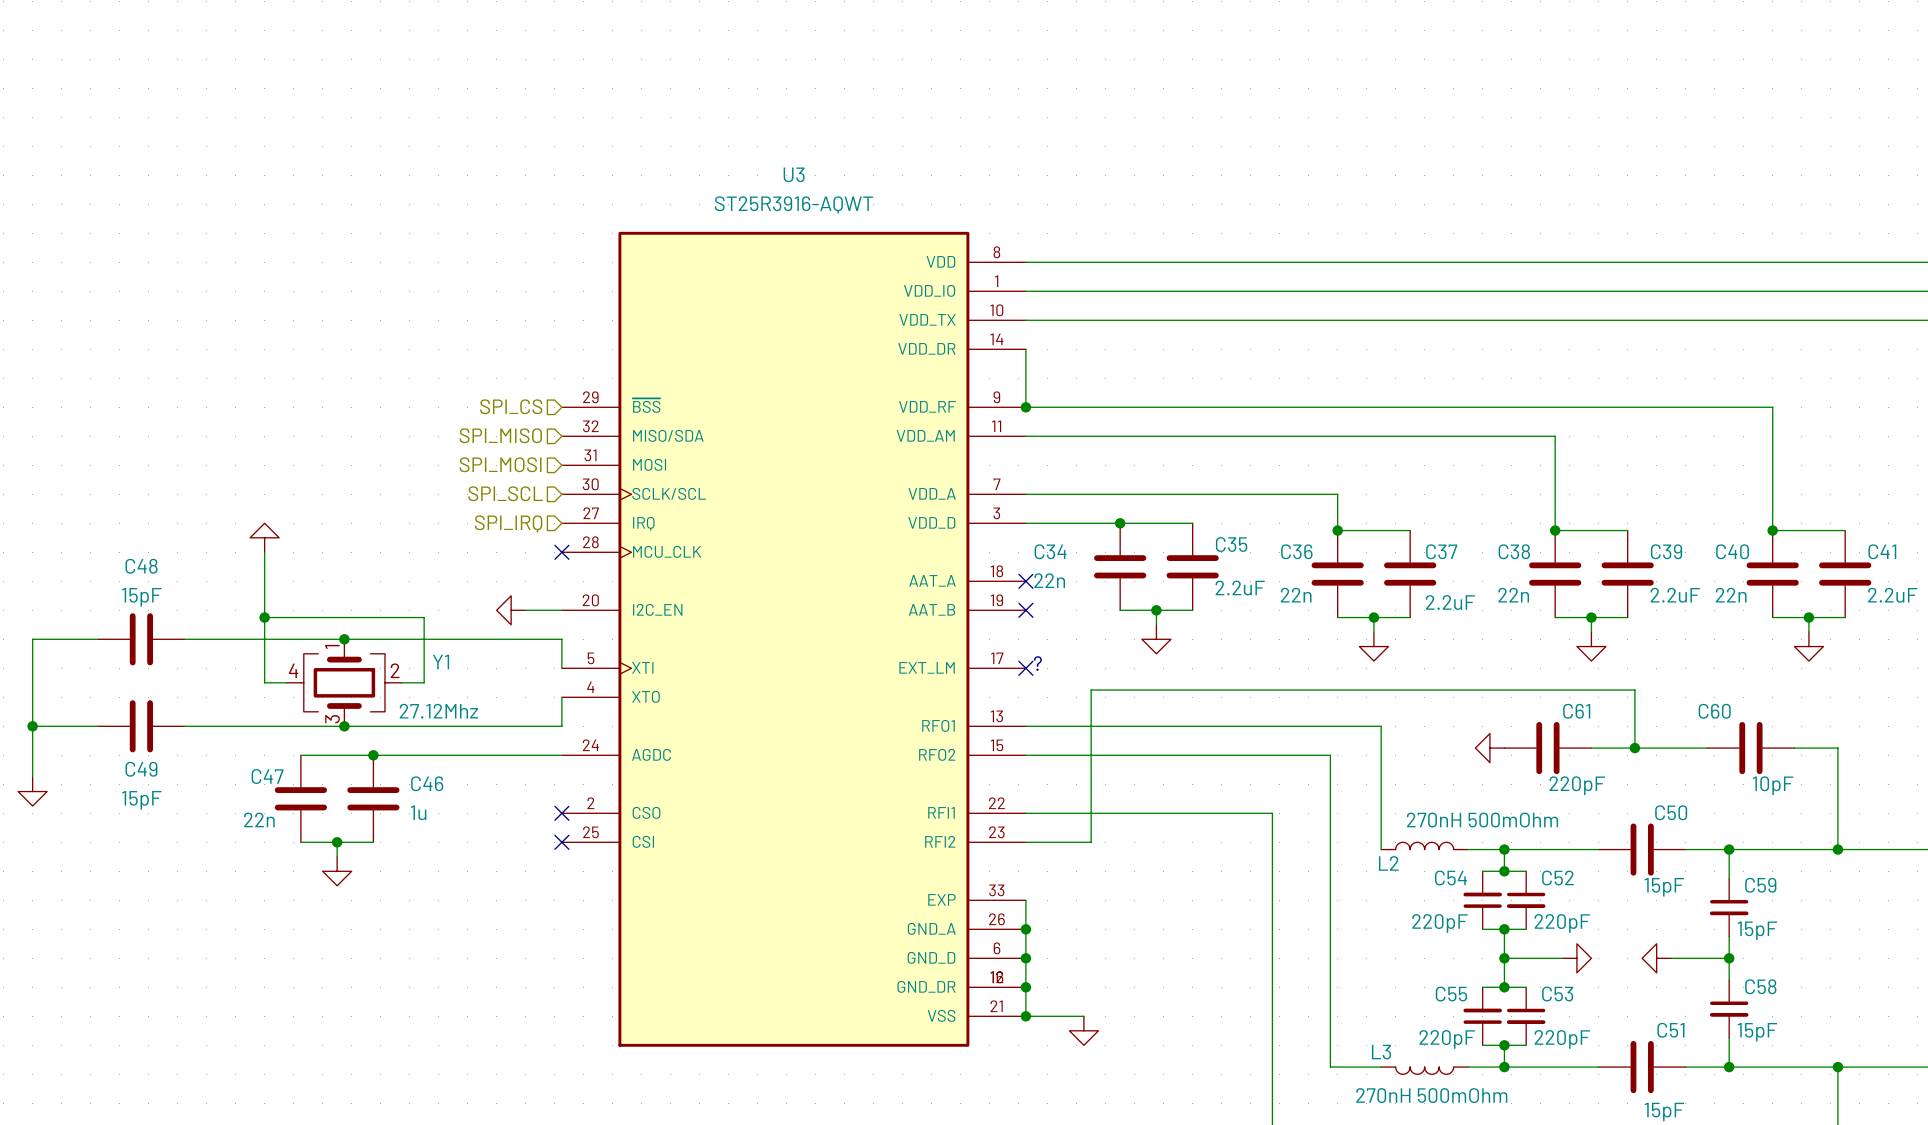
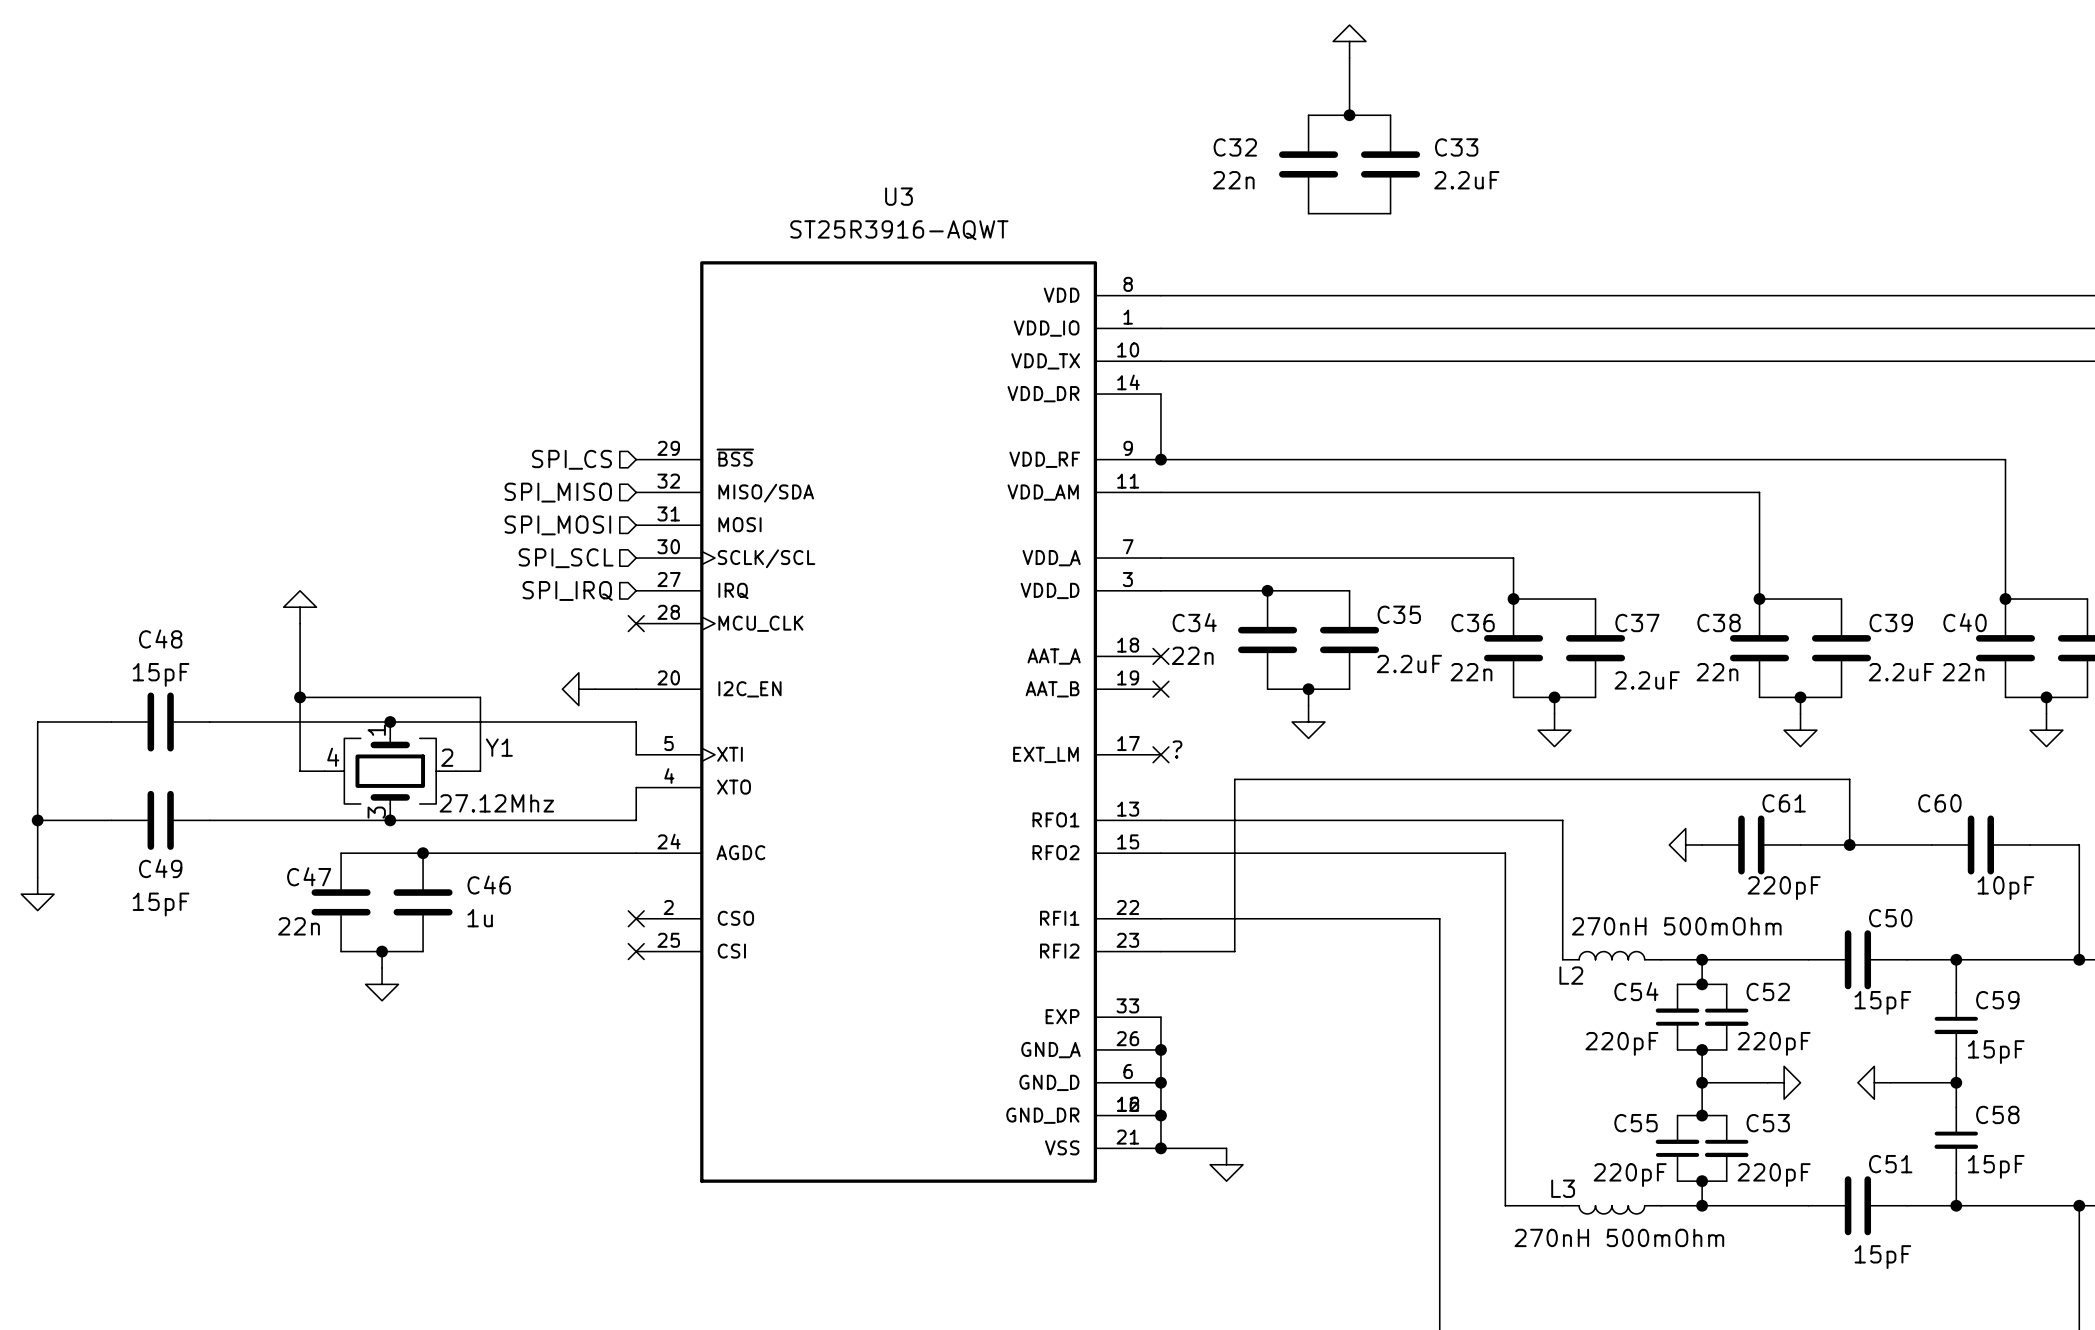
power symbol: none -> (1349, 41)
wire: none -> (1349, 57) (1349, 115)
wire: none -> (1308, 115) (1390, 115)
junction: none -> (1349, 115)
C32: none -> 22n (1308, 164)
C33: none -> 2.2uF (1390, 164)
wire: none -> (1308, 213) (1390, 213)

